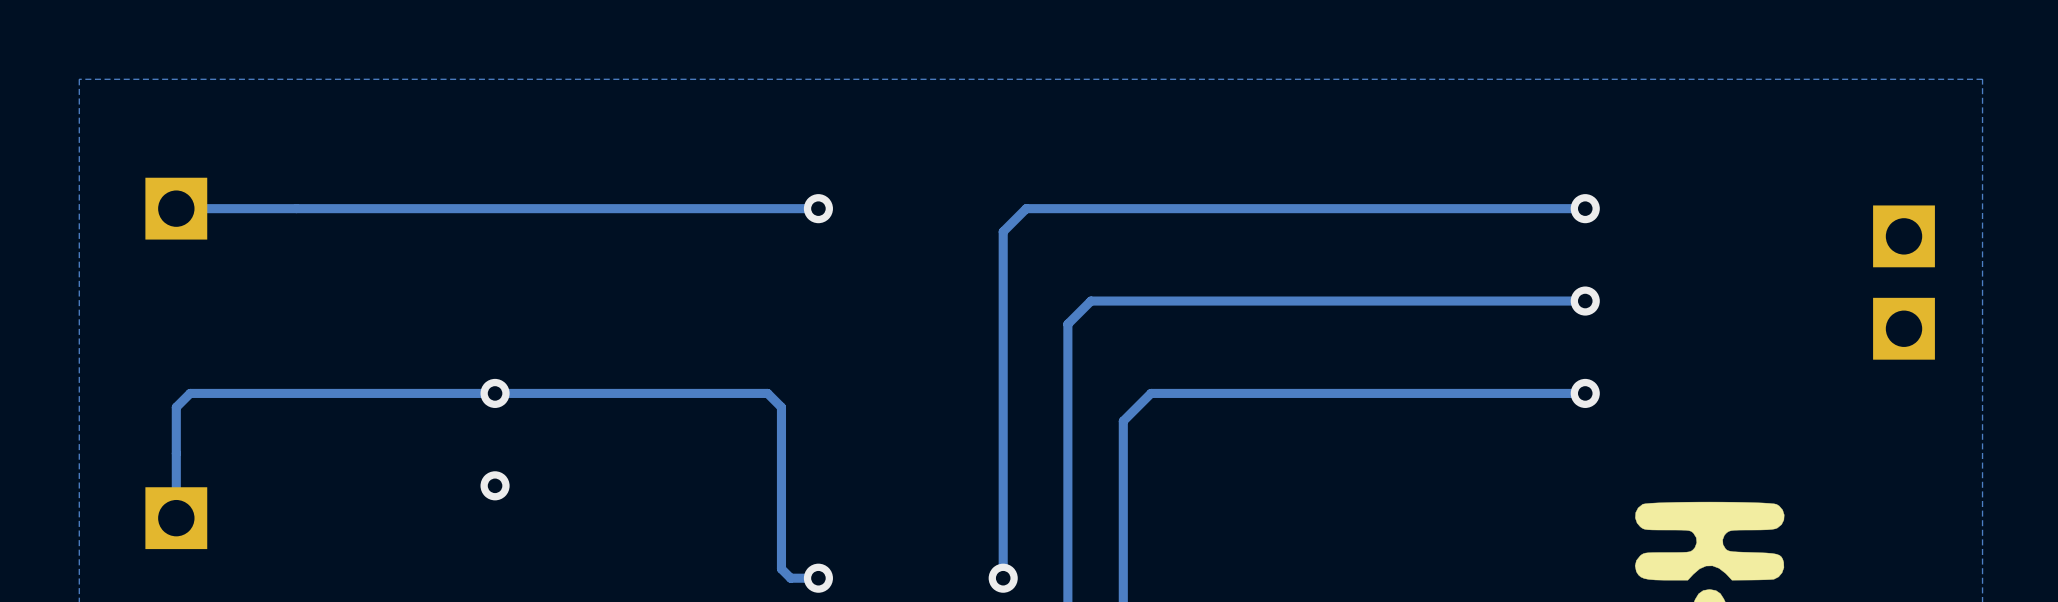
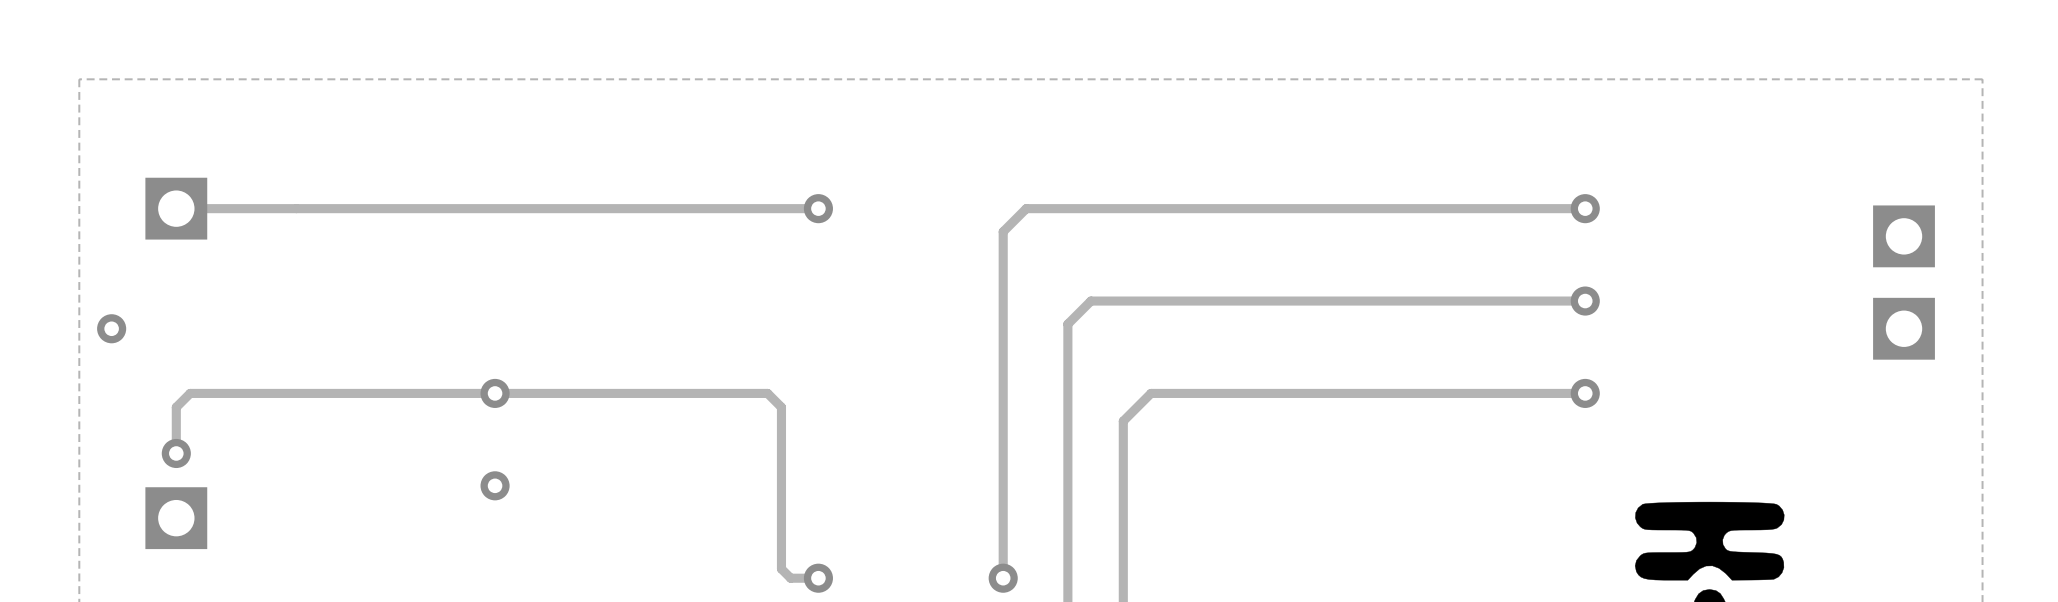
via: none -> (111, 328)
track: (176, 453) (176, 518) -> none
via: none -> (176, 453)

